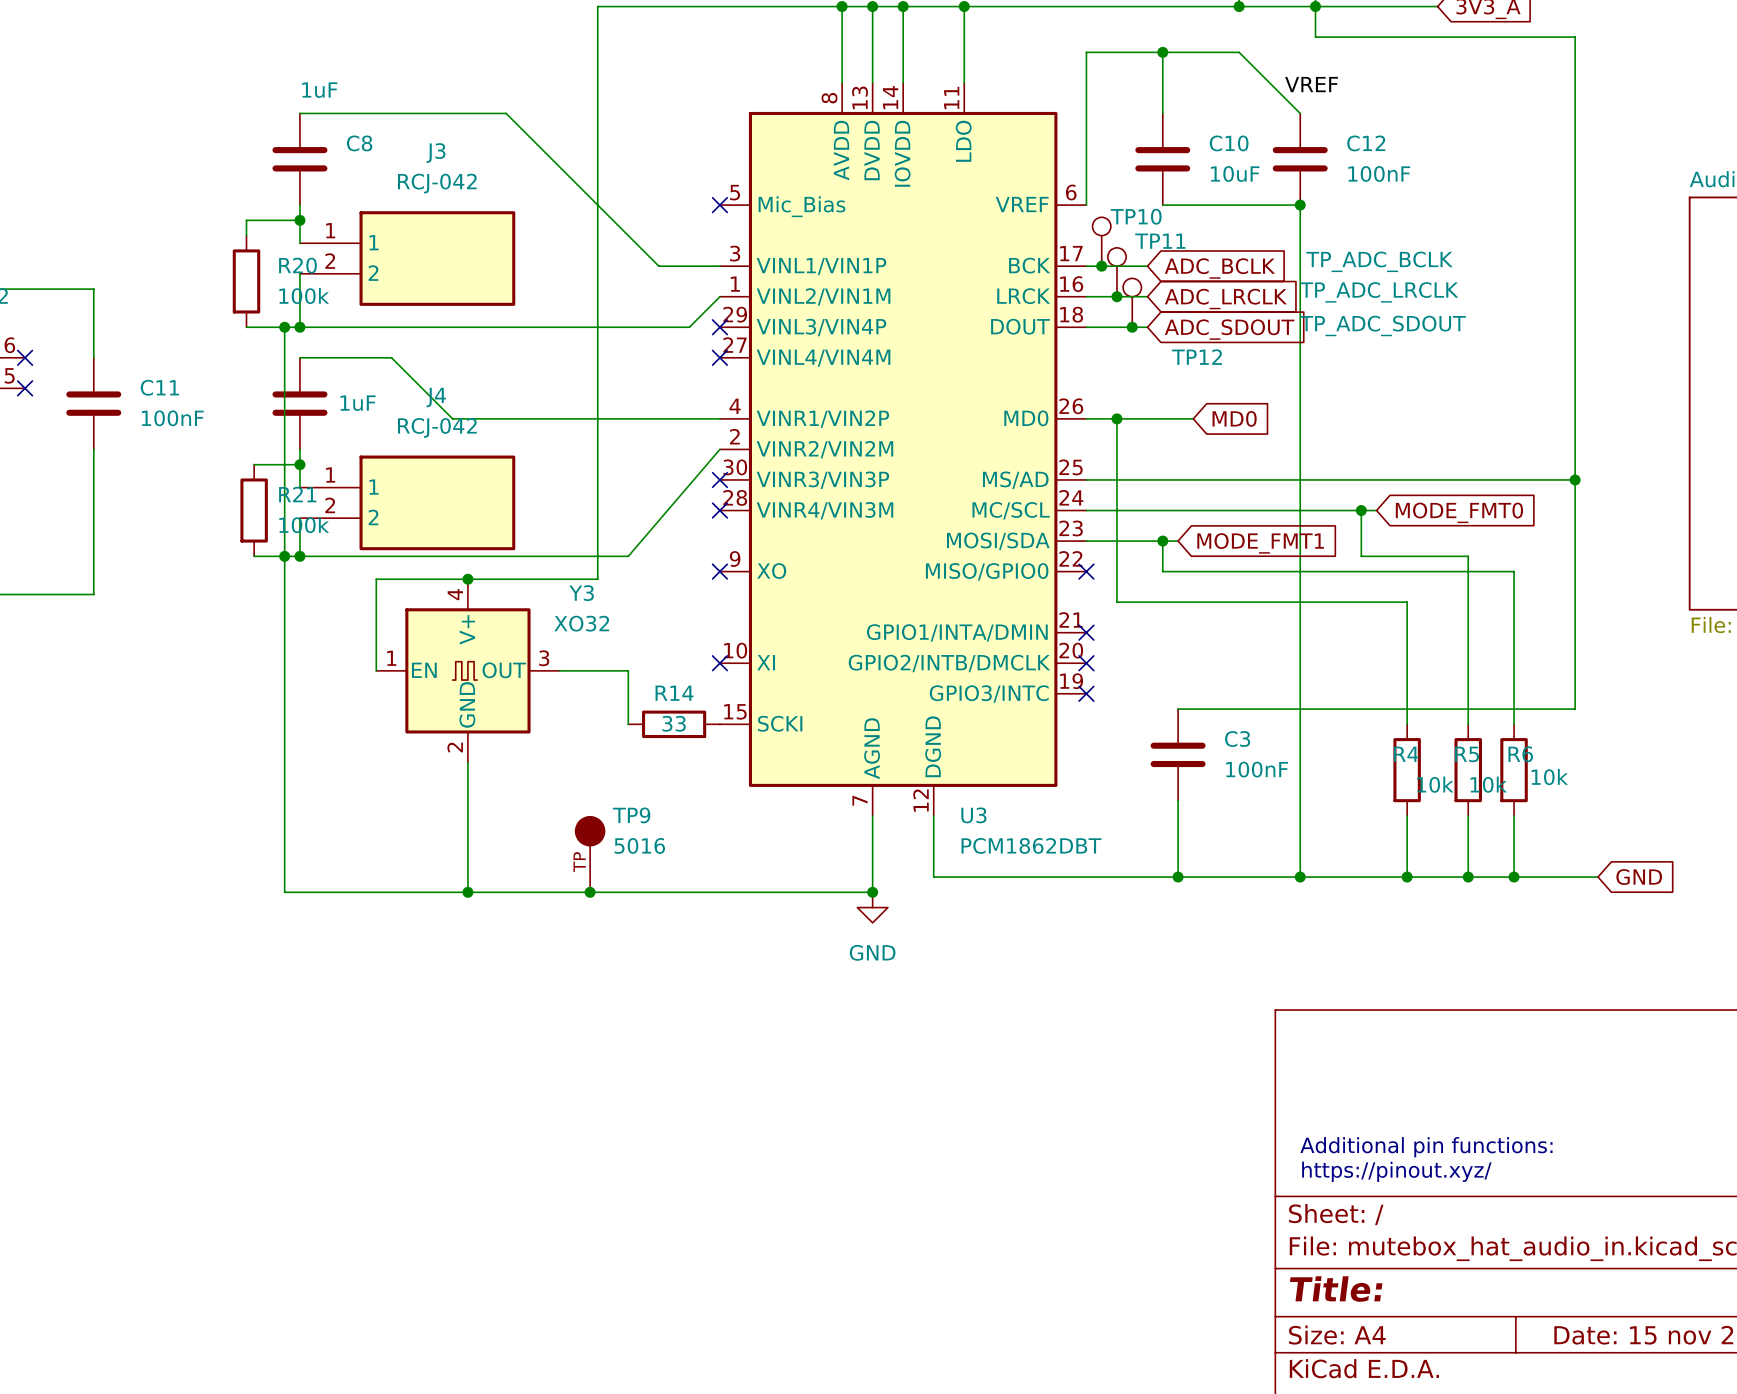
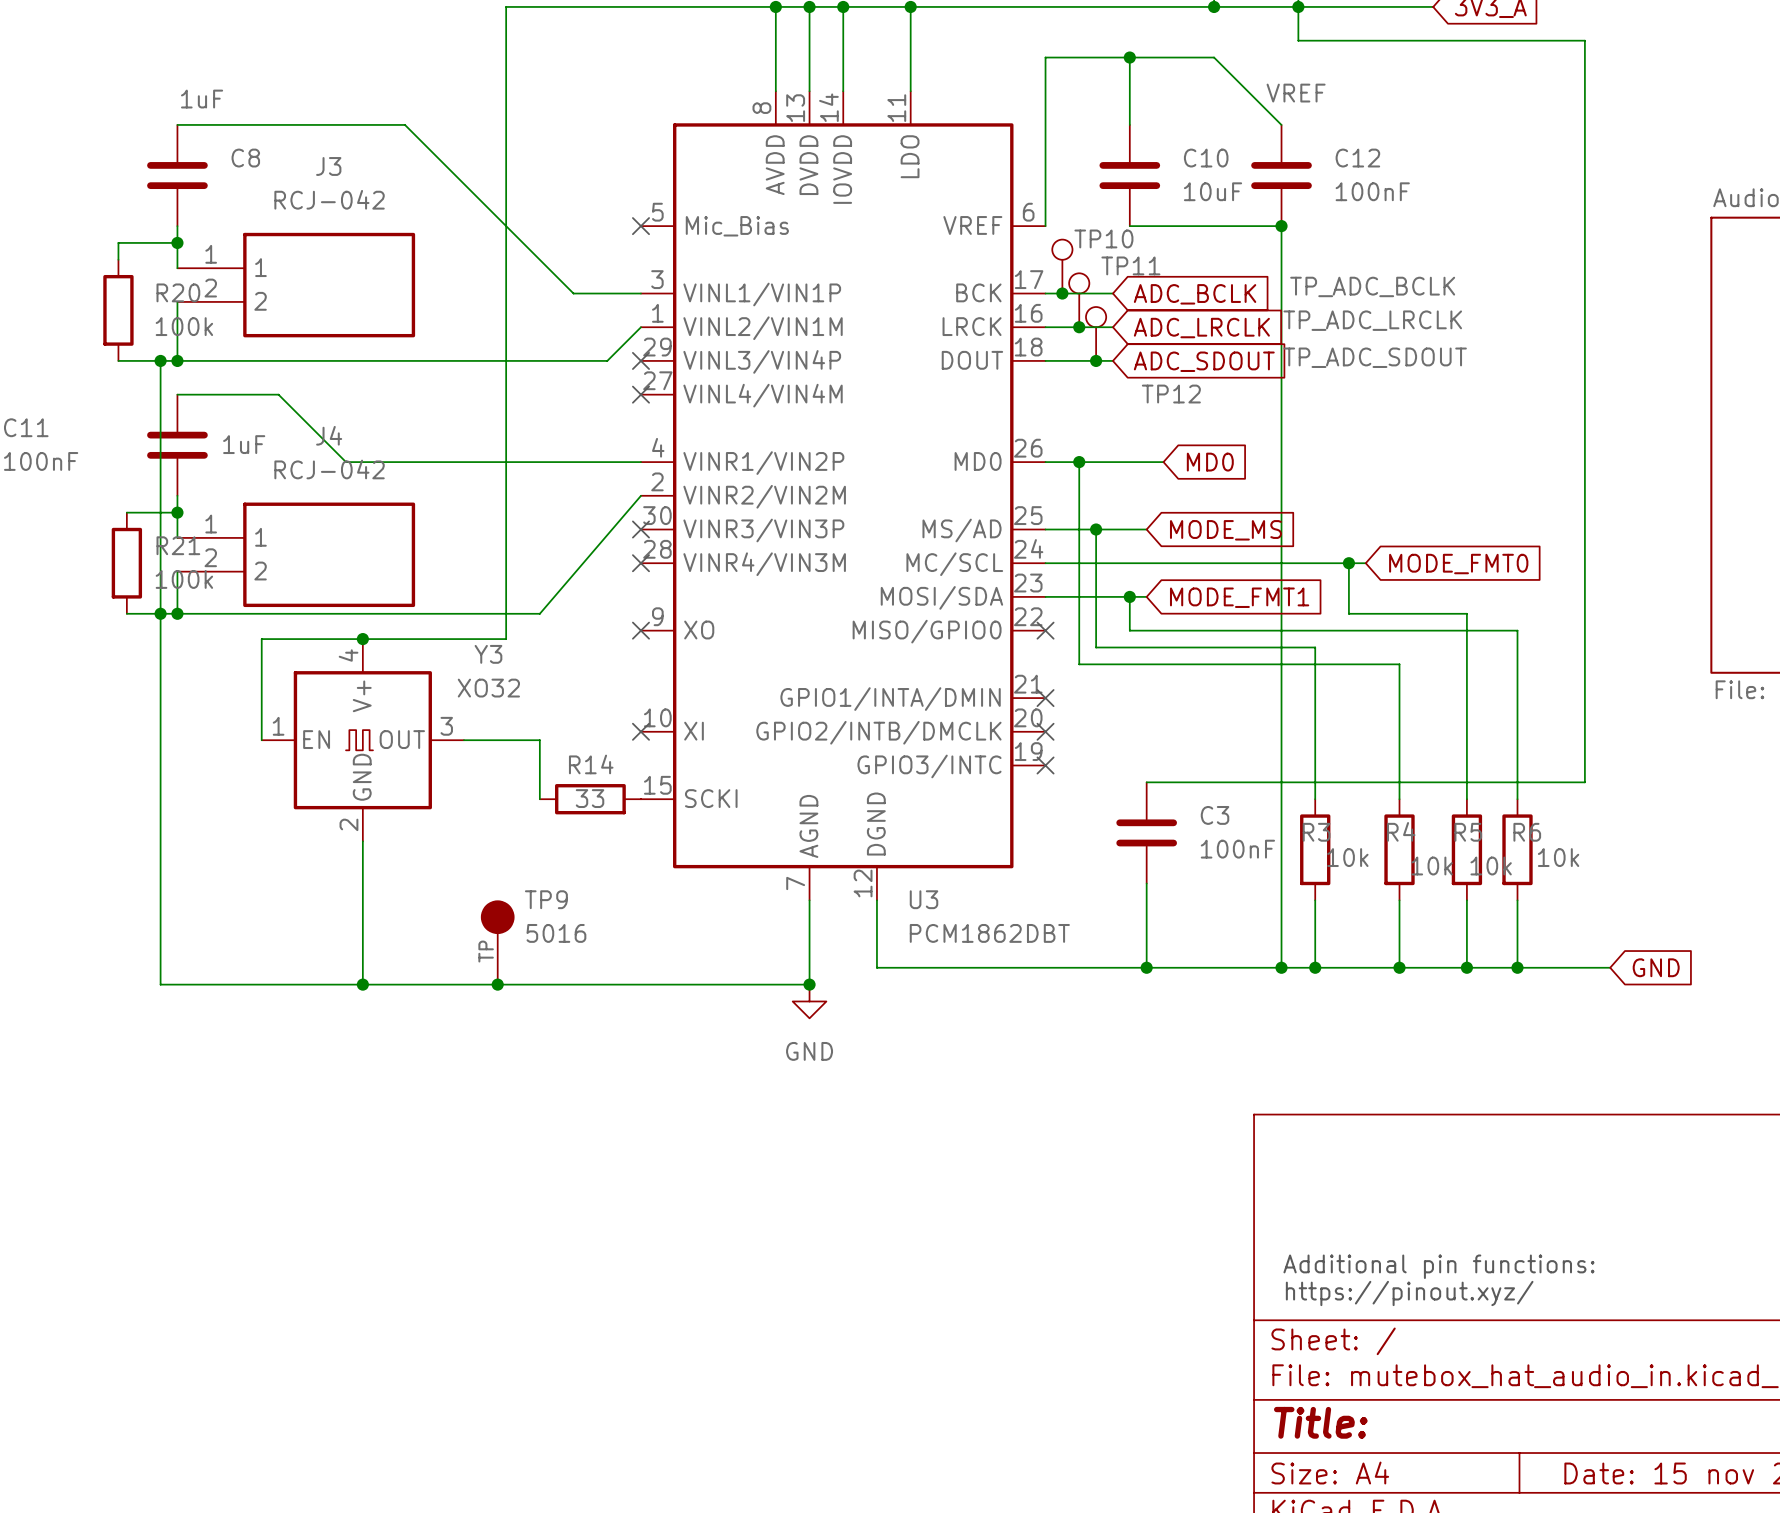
wire: none -> (1096, 529) (1096, 647) (1315, 647) (1315, 799)
junction: none -> (1096, 529)
wire: (1178, 479) (1575, 479) -> none
junction: (1575, 479) -> none
global label: none -> MODE_MS (1225, 530)
R3: none -> 10k (1315, 849)
wire: none -> (1315, 900) (1315, 967)
junction: none -> (1315, 967)

